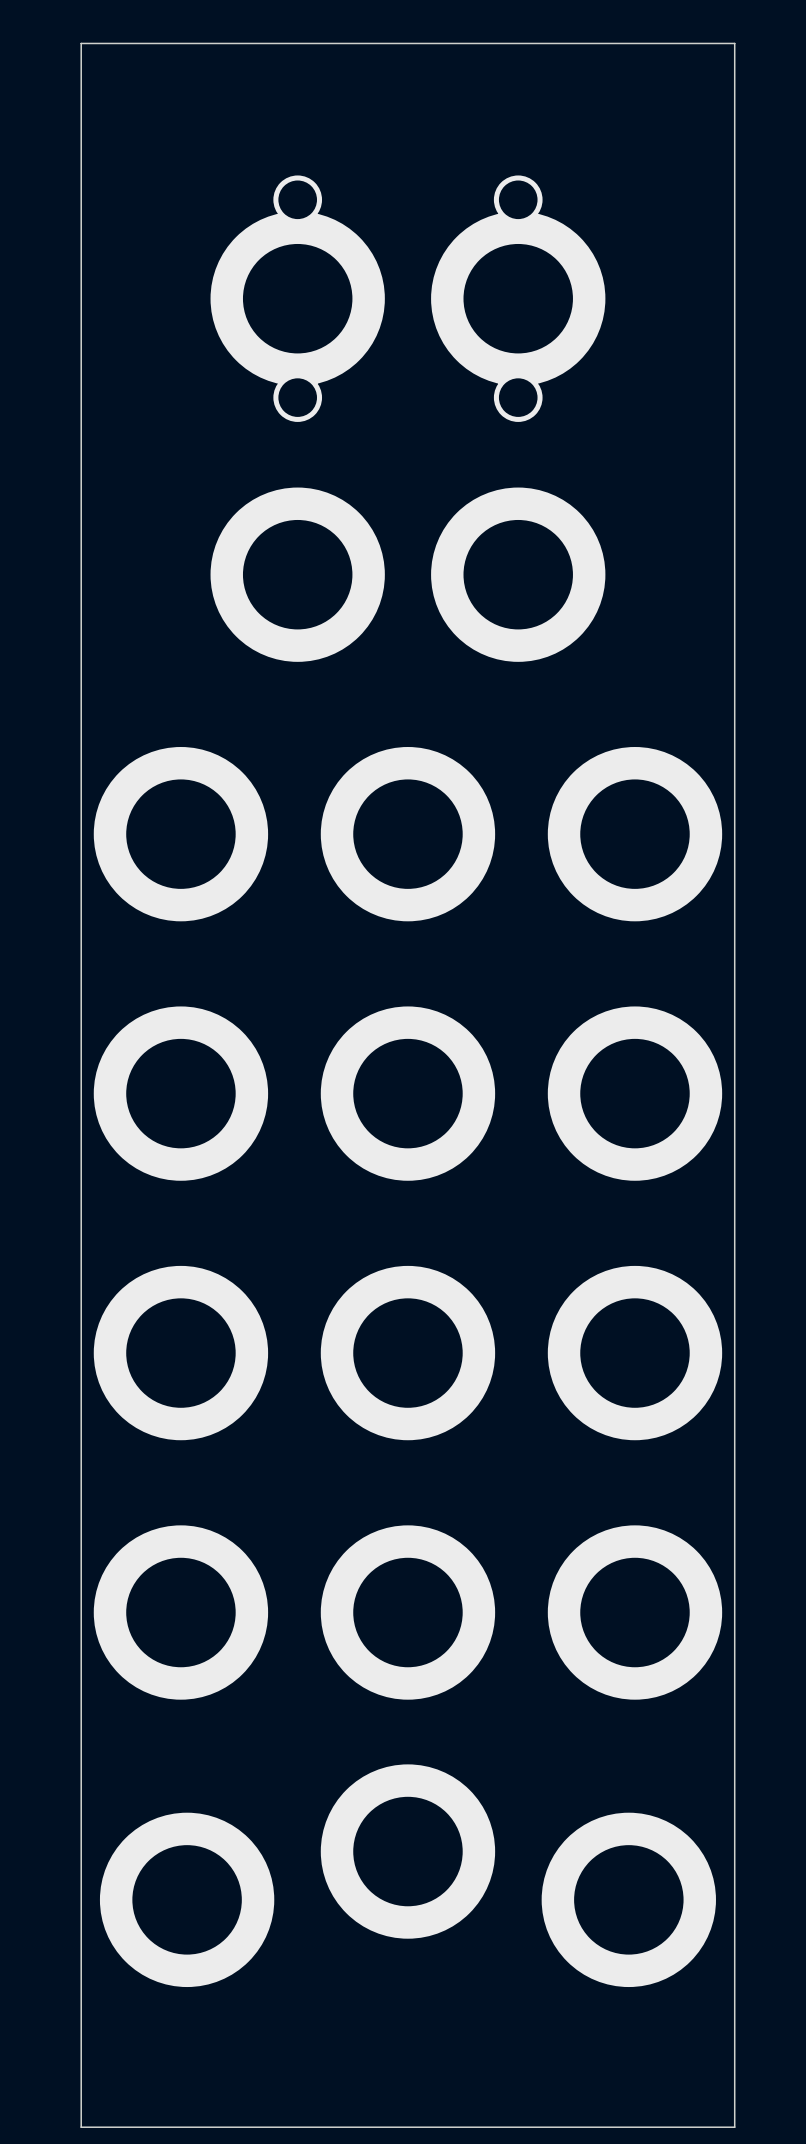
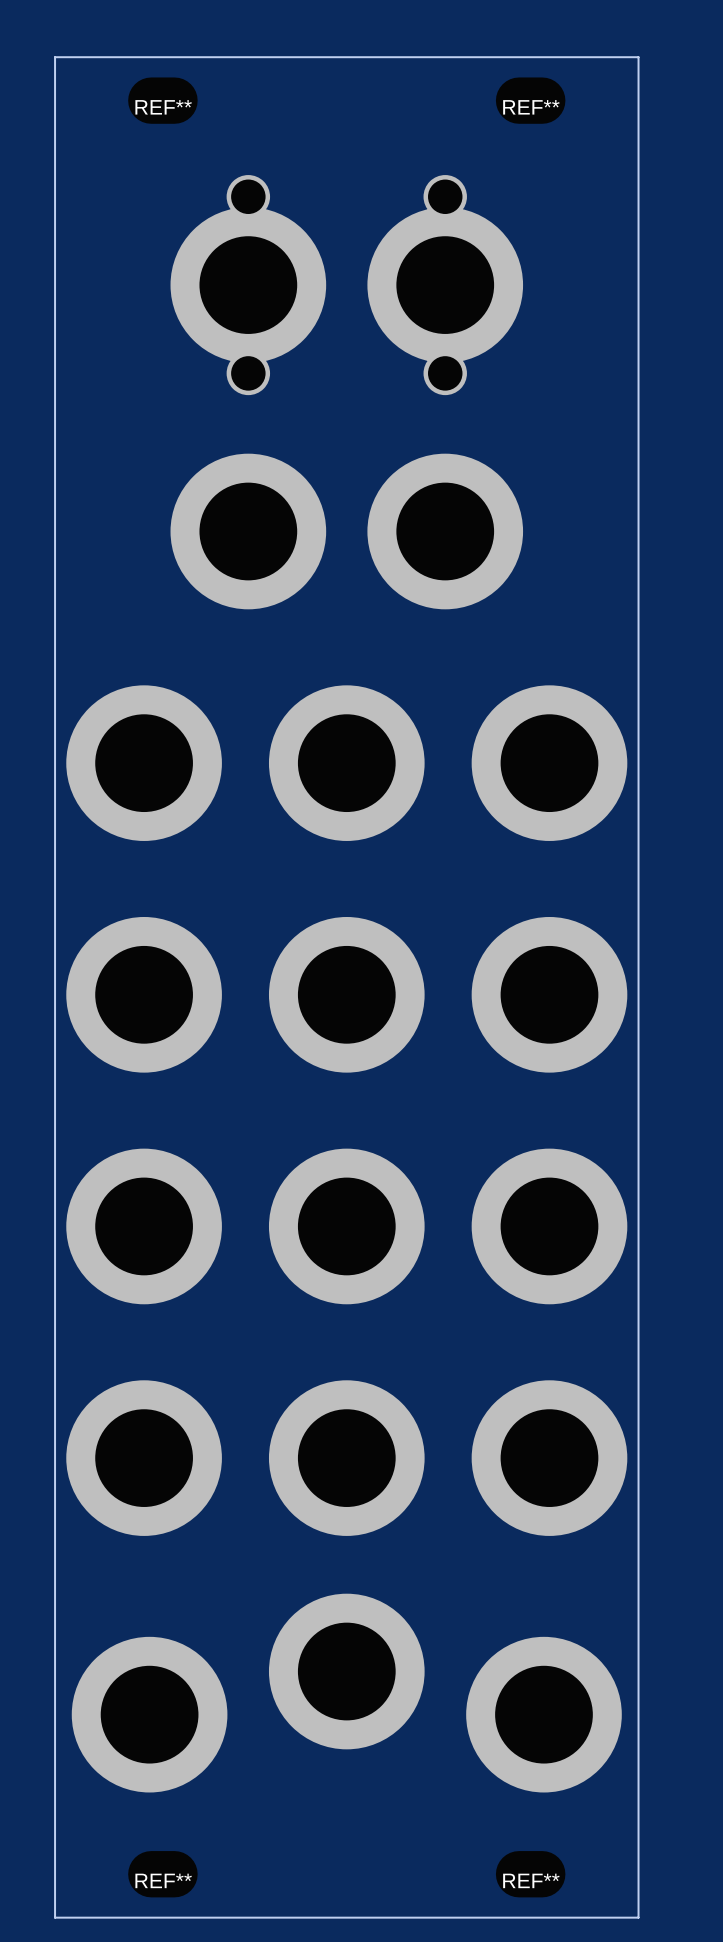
REF**: none -> (162, 100)
REF**: none -> (530, 100)
REF**: none -> (162, 1874)
REF**: none -> (530, 1874)

